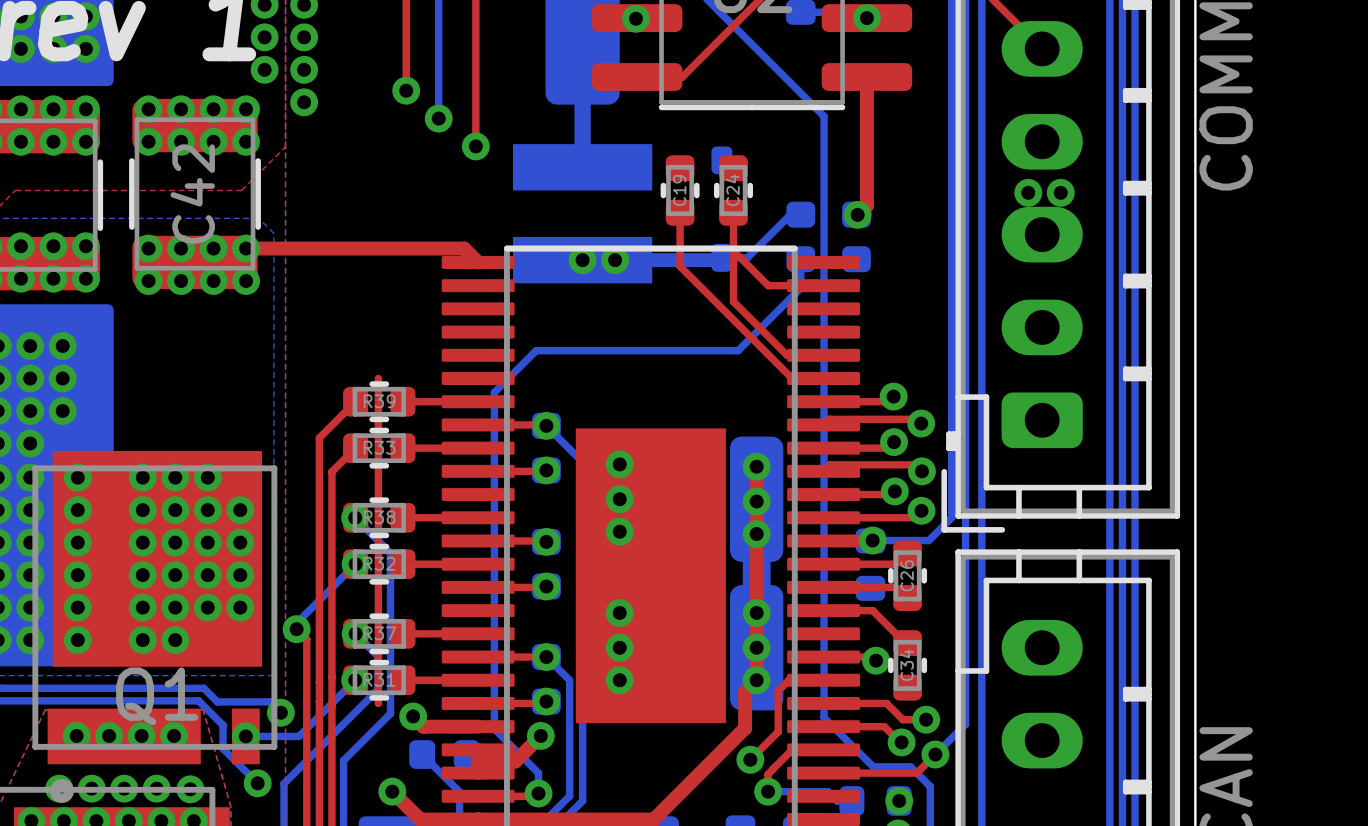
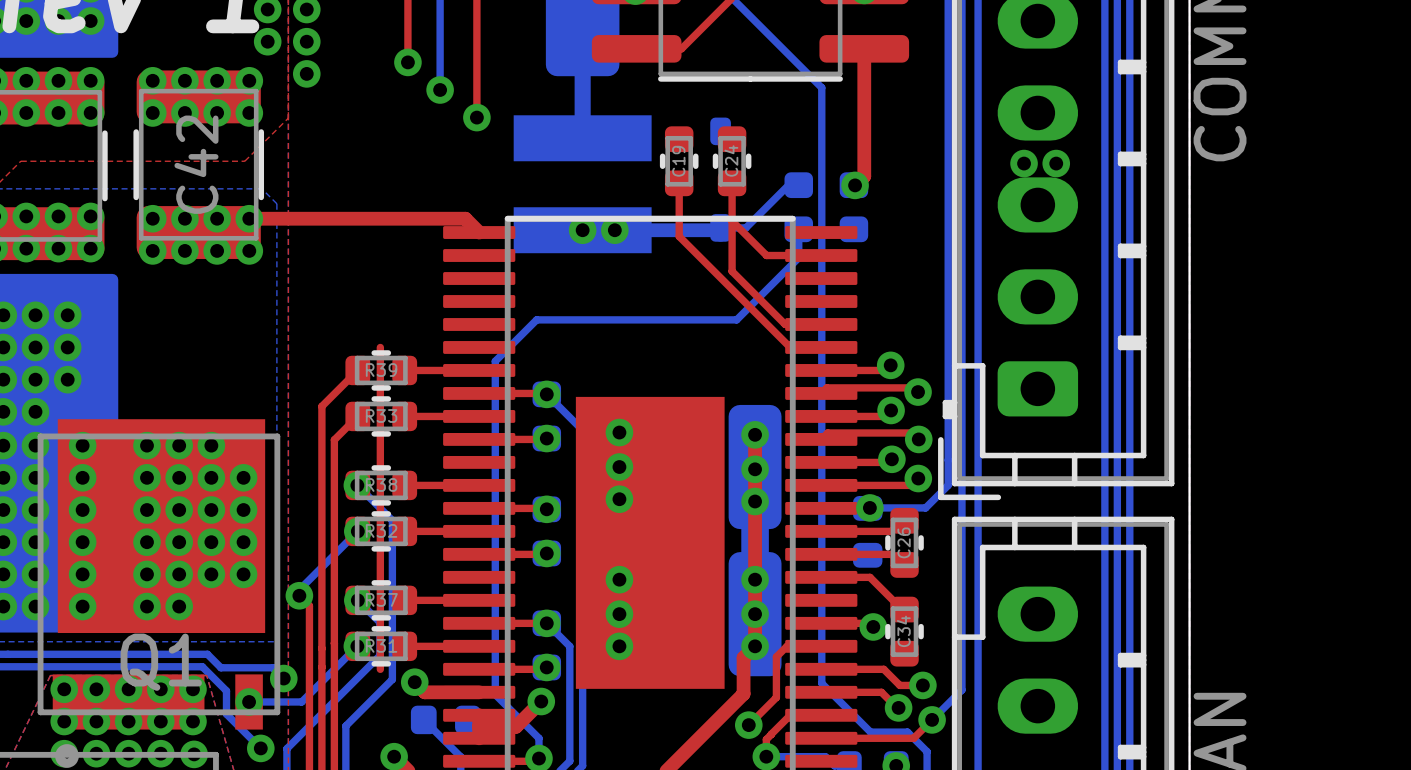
via: none -> (64, 689)
via: none -> (96, 689)
via: none -> (128, 689)
via: none -> (160, 689)
via: none -> (192, 689)
via: (76, 735) -> none
via: (109, 735) -> none
via: (141, 735) -> none
via: (174, 735) -> none
via: none -> (64, 721)
via: none -> (96, 721)
via: none -> (128, 721)
via: none -> (160, 721)
via: none -> (192, 721)

